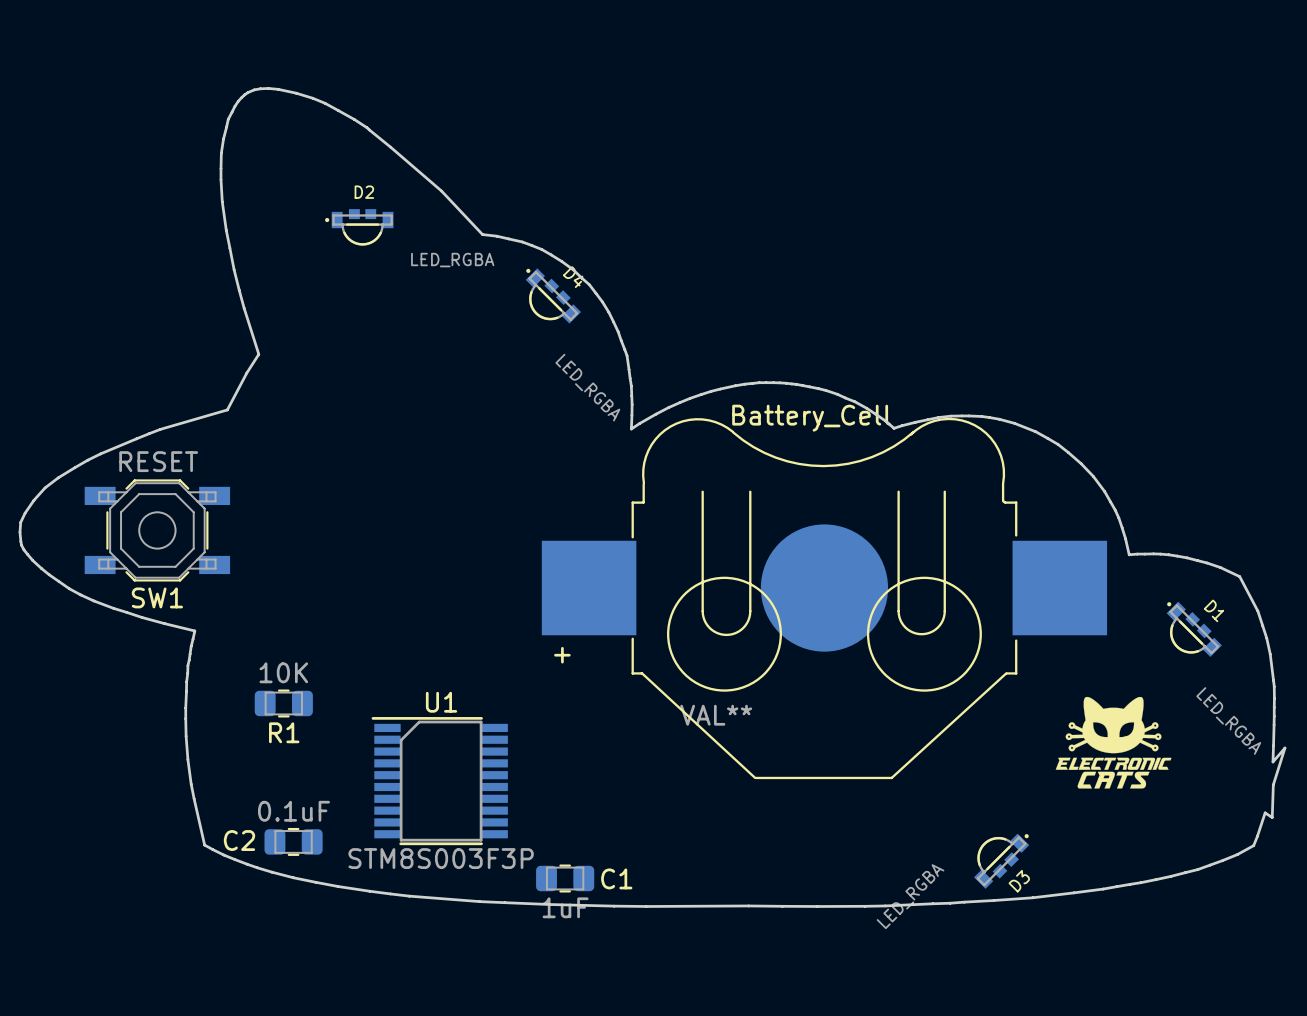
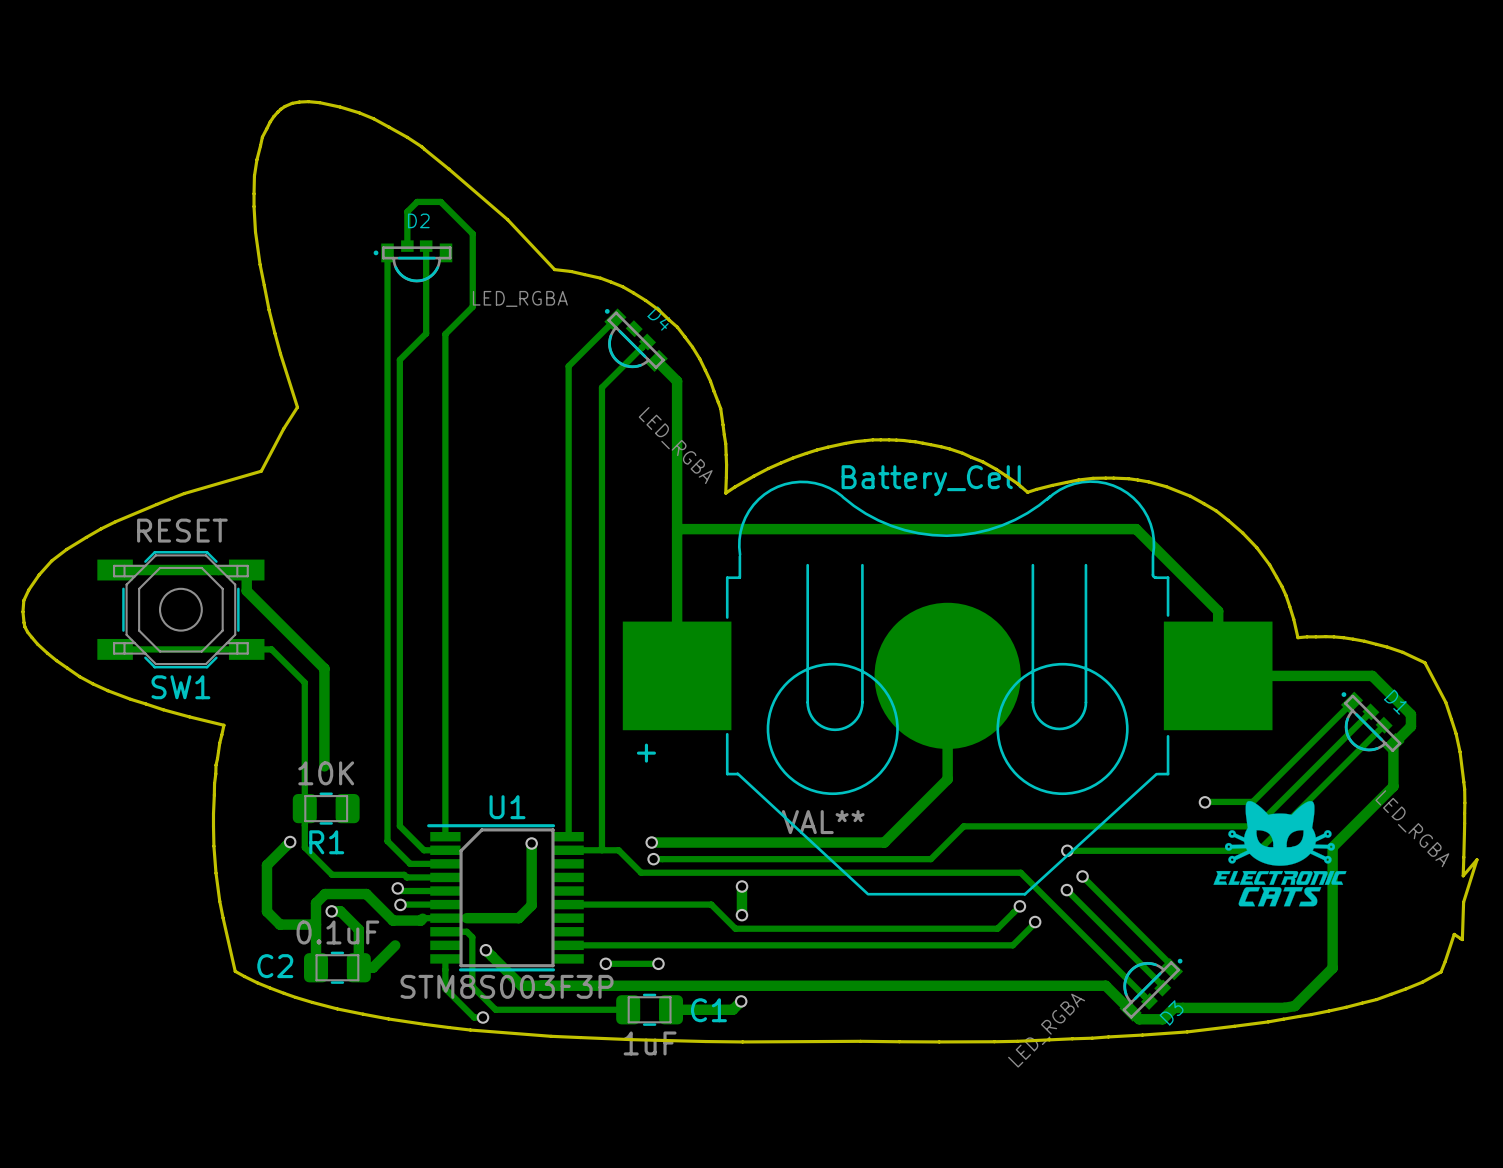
track: none -> (407, 246) (407, 211) (417, 201) (440, 201) (472, 233) (472, 306) (445, 334) (445, 836)
track: none -> (426, 246) (426, 333) (399, 359) (399, 826) (423, 850) (445, 850)
track: none -> (387, 252) (387, 841) (410, 863) (445, 863)
track: none -> (615, 319) (568, 366) (568, 836)
track: none -> (647, 342) (601, 387) (601, 850)
track: none -> (656, 360) (677, 381) (677, 675)
track: none -> (677, 529) (1136, 529) (1218, 611) (1218, 675) (1372, 675) (1410, 714) (1410, 726) (1393, 744) (1393, 786) (1332, 847) (1332, 968) (1294, 1006) (1284, 1007) (1174, 1007) (1162, 1019) (1139, 1019) (1105, 985) (521, 985) (485, 950)
track: none -> (115, 570) (246, 570) (246, 590) (324, 668) (324, 766)
track: none -> (115, 649) (271, 649) (304, 682) (304, 847) (332, 874) (404, 874) (406, 877) (445, 877)
track: none -> (947, 675) (947, 779) (884, 842) (651, 842)
track: none -> (1352, 702) (1252, 801) (1204, 802)
track: none -> (1370, 711) (1256, 826) (963, 826) (930, 859) (653, 859)
track: none -> (1384, 725) (1258, 850) (1067, 850)
via: none -> (1204, 802)
track: none -> (290, 842) (266, 865) (266, 911) (279, 924) (316, 924)
via: none -> (290, 842)
track: none -> (531, 843) (531, 905) (518, 918) (423, 918) (420, 920) (392, 920) (366, 894) (325, 894) (316, 903) (316, 967)
via: none -> (531, 843)
via: none -> (651, 842)
track: none -> (568, 850) (618, 850) (641, 872) (1020, 872) (1149, 1001)
via: none -> (1067, 850)
via: none -> (653, 859)
track: none -> (1082, 876) (1171, 965) (1171, 969)
via: none -> (1082, 876)
track: none -> (741, 886) (741, 915)
via: none -> (742, 886)
track: none -> (397, 888) (400, 891) (445, 891)
via: none -> (397, 888)
track: none -> (1066, 890) (1162, 985) (1162, 988)
via: none -> (1066, 890)
track: none -> (445, 904) (400, 904)
track: none -> (568, 904) (711, 904) (735, 928) (997, 928) (1019, 906)
via: none -> (400, 904)
via: none -> (1019, 906)
track: none -> (331, 911) (340, 911) (358, 929) (358, 967) (372, 967) (395, 945)
via: none -> (331, 911)
via: none -> (741, 915)
track: none -> (1035, 922) (1012, 945) (568, 945)
via: none -> (1035, 922)
track: none -> (445, 931) (466, 931) (472, 937) (472, 986) (495, 1009) (628, 1009)
via: none -> (485, 950)
track: none -> (445, 958) (445, 988) (474, 1017) (482, 1017)
via: none -> (605, 963)
track: none -> (658, 963) (605, 963)
via: none -> (658, 963)
track: none -> (741, 1001) (732, 1009) (671, 1009)
via: none -> (741, 1001)
via: none -> (482, 1017)

